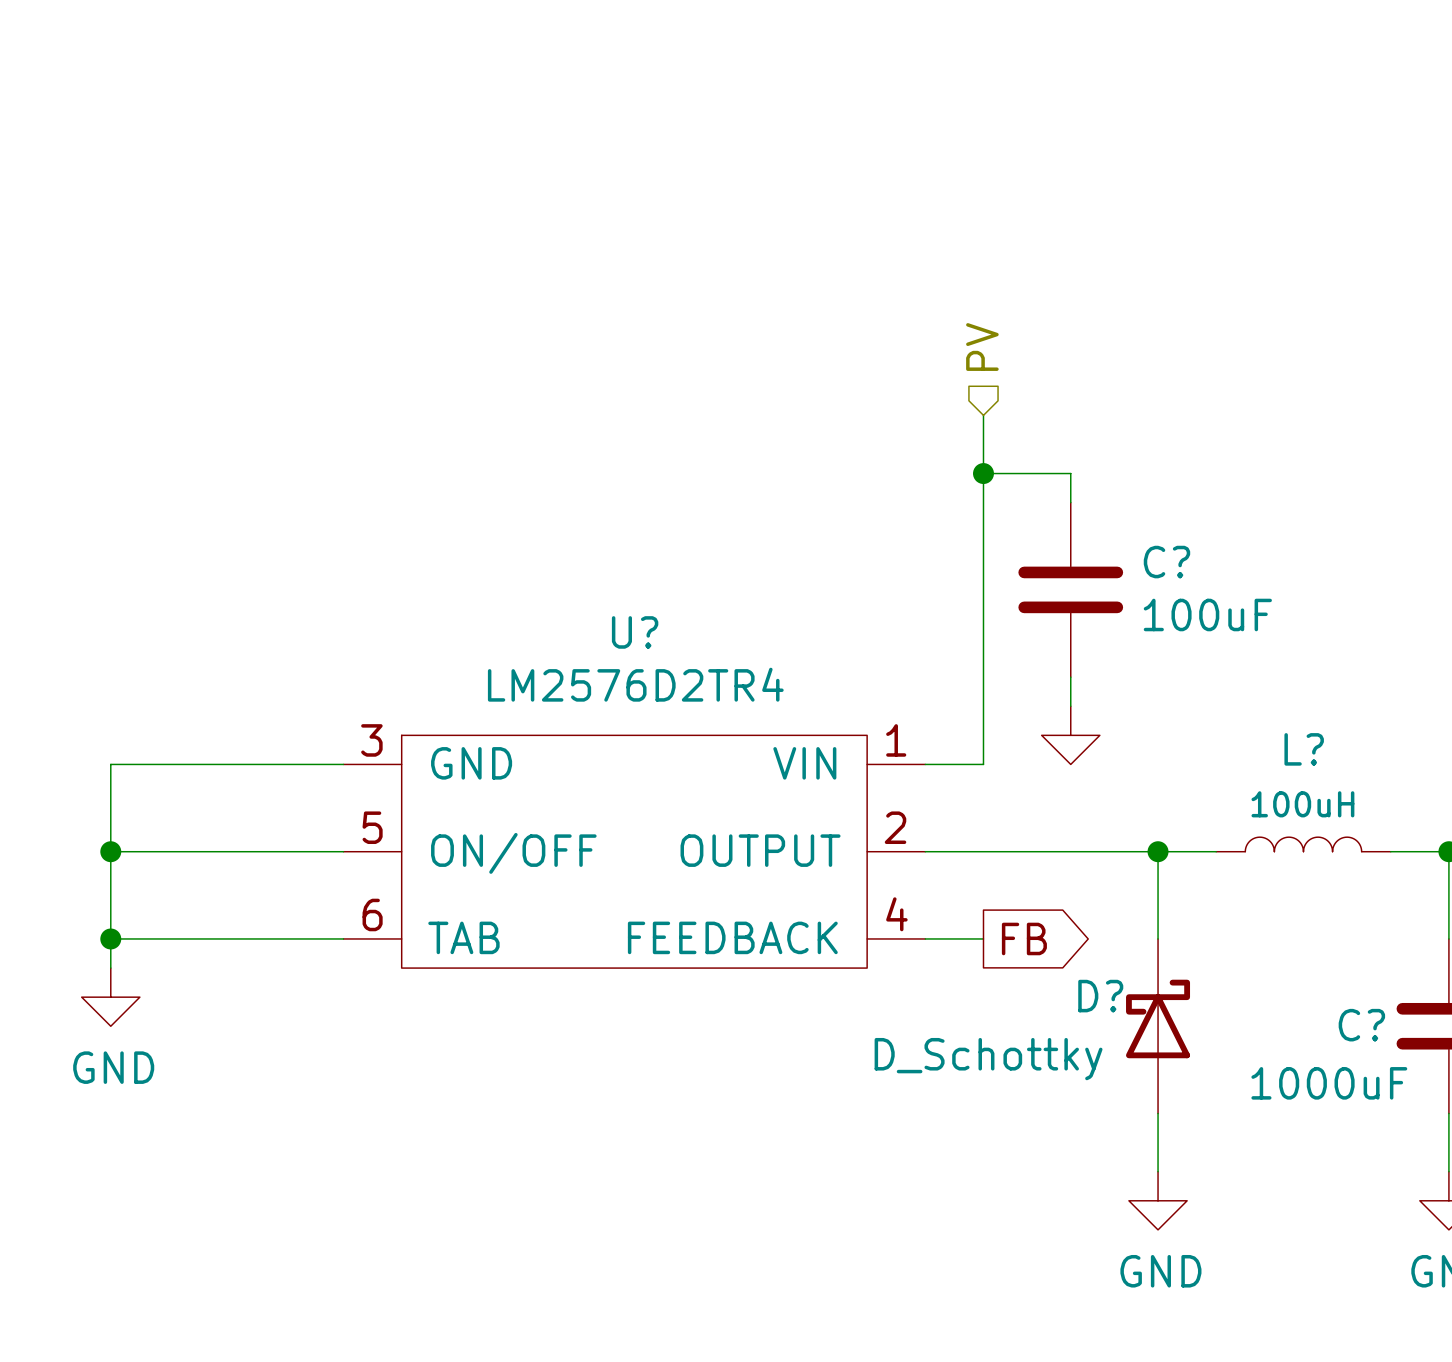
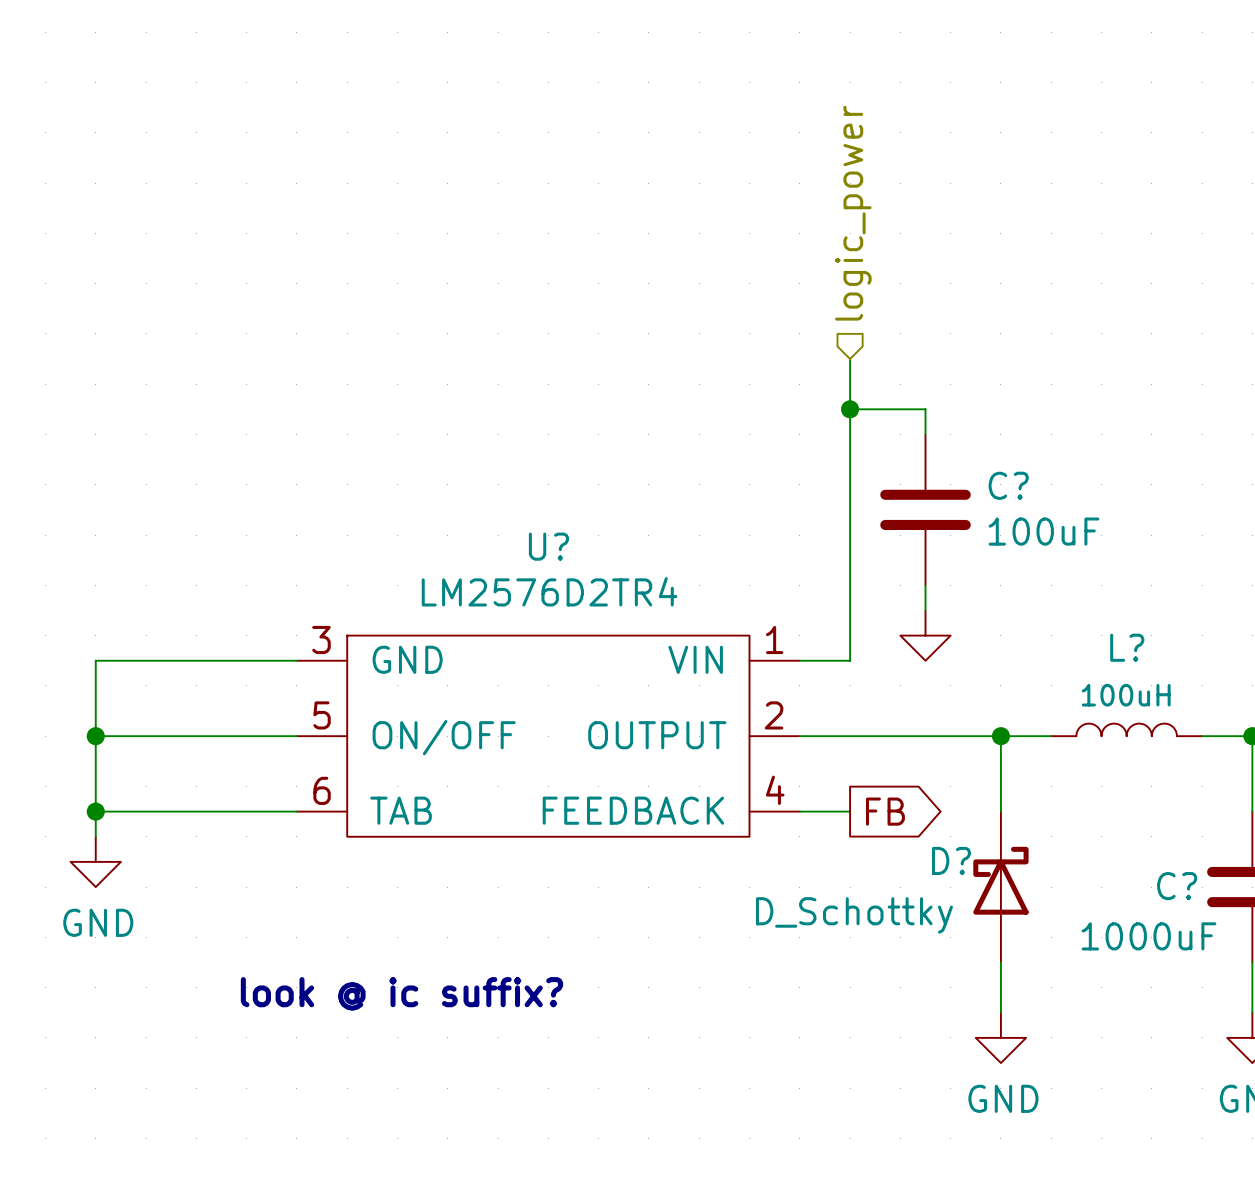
hierarchical label: PV (982, 347) -> logic_power (853, 213)
text: none -> look @ ic suffix? (401, 993)

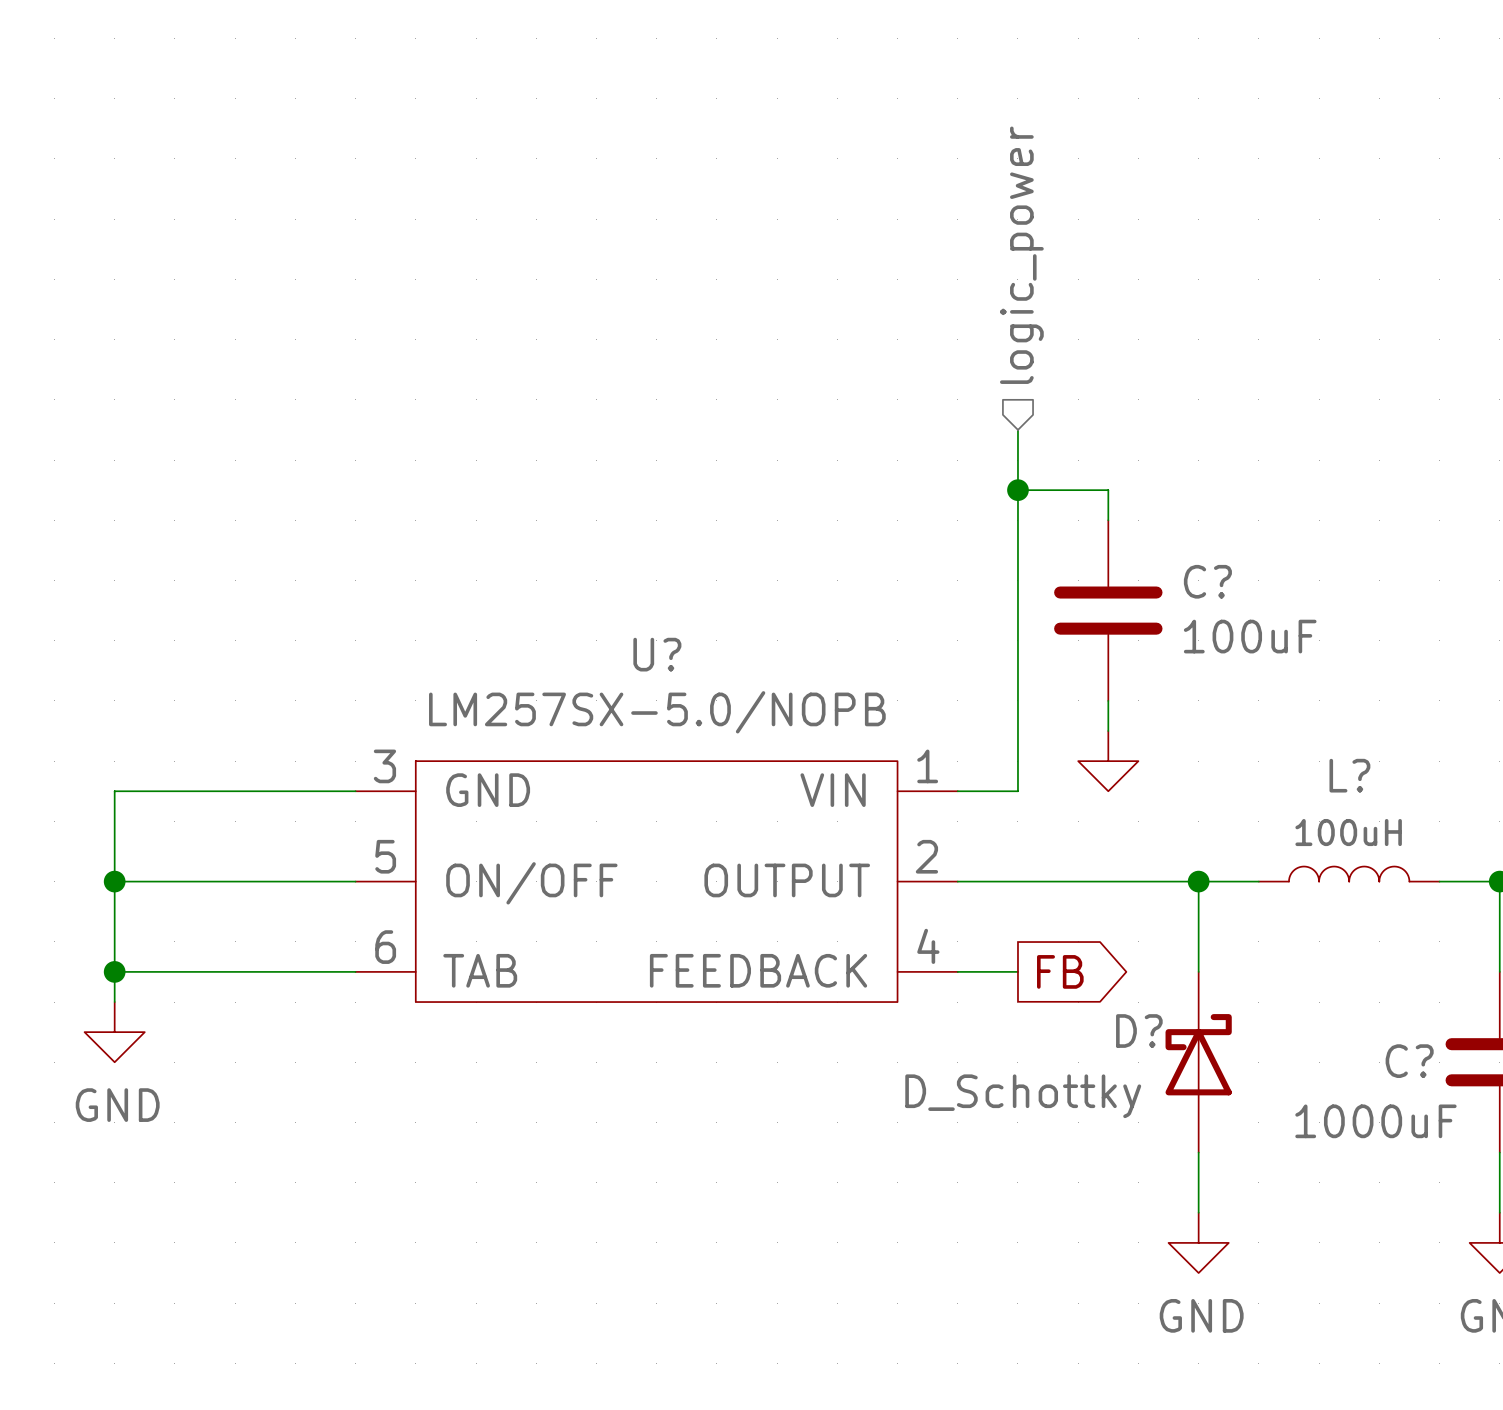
U? value: LM2576D2TR4 (549, 591) -> LM257SX-5.0/NOPB (657, 712)
text: look @ ic suffix? (401, 993) -> none

